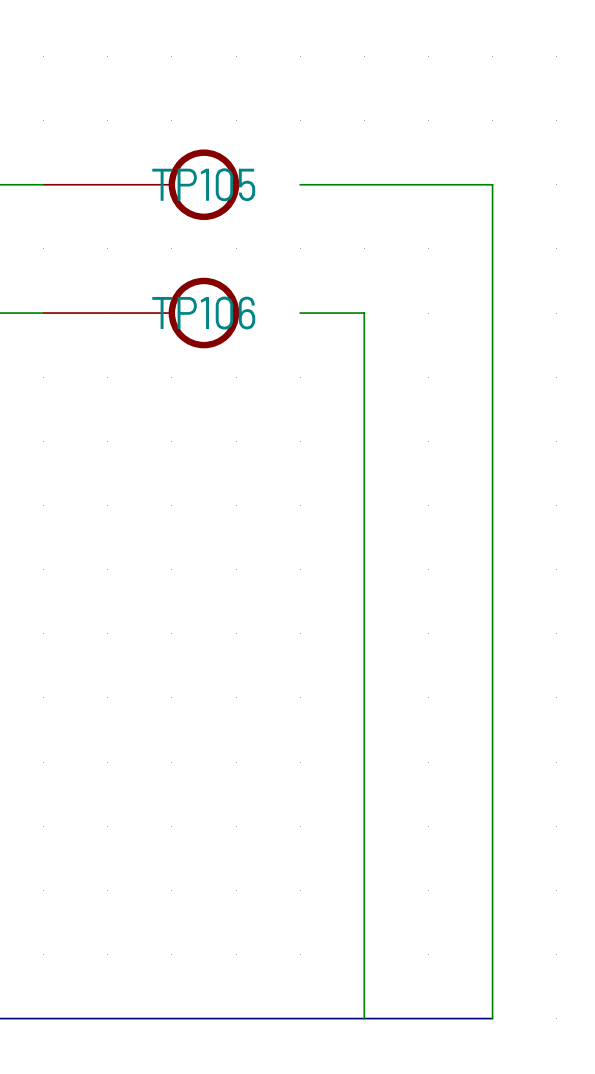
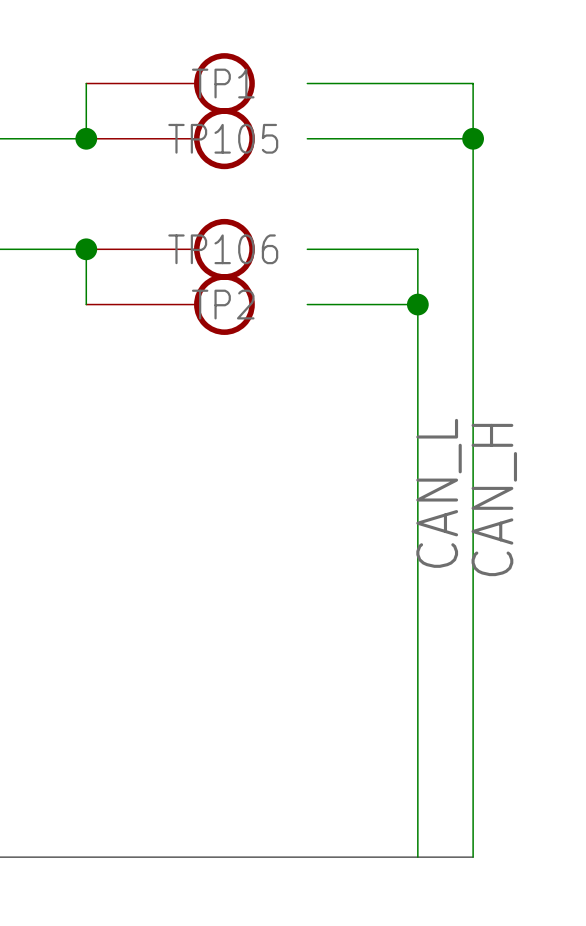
wire: none -> (86, 83) (86, 138)
TP1: none -> (170, 83)
wire: none -> (307, 83) (473, 83) (473, 138)
junction: none -> (86, 138)
junction: none -> (473, 138)
wire: none -> (86, 249) (86, 304)
junction: none -> (86, 249)
wire: (364, 313) (364, 1018) -> (362, 249) (417, 249) (417, 857)
TP2: none -> (170, 304)
wire: none -> (307, 304) (417, 304)
junction: none -> (417, 304)
label: none -> CAN_L (439, 493)
label: none -> CAN_H (494, 500)

